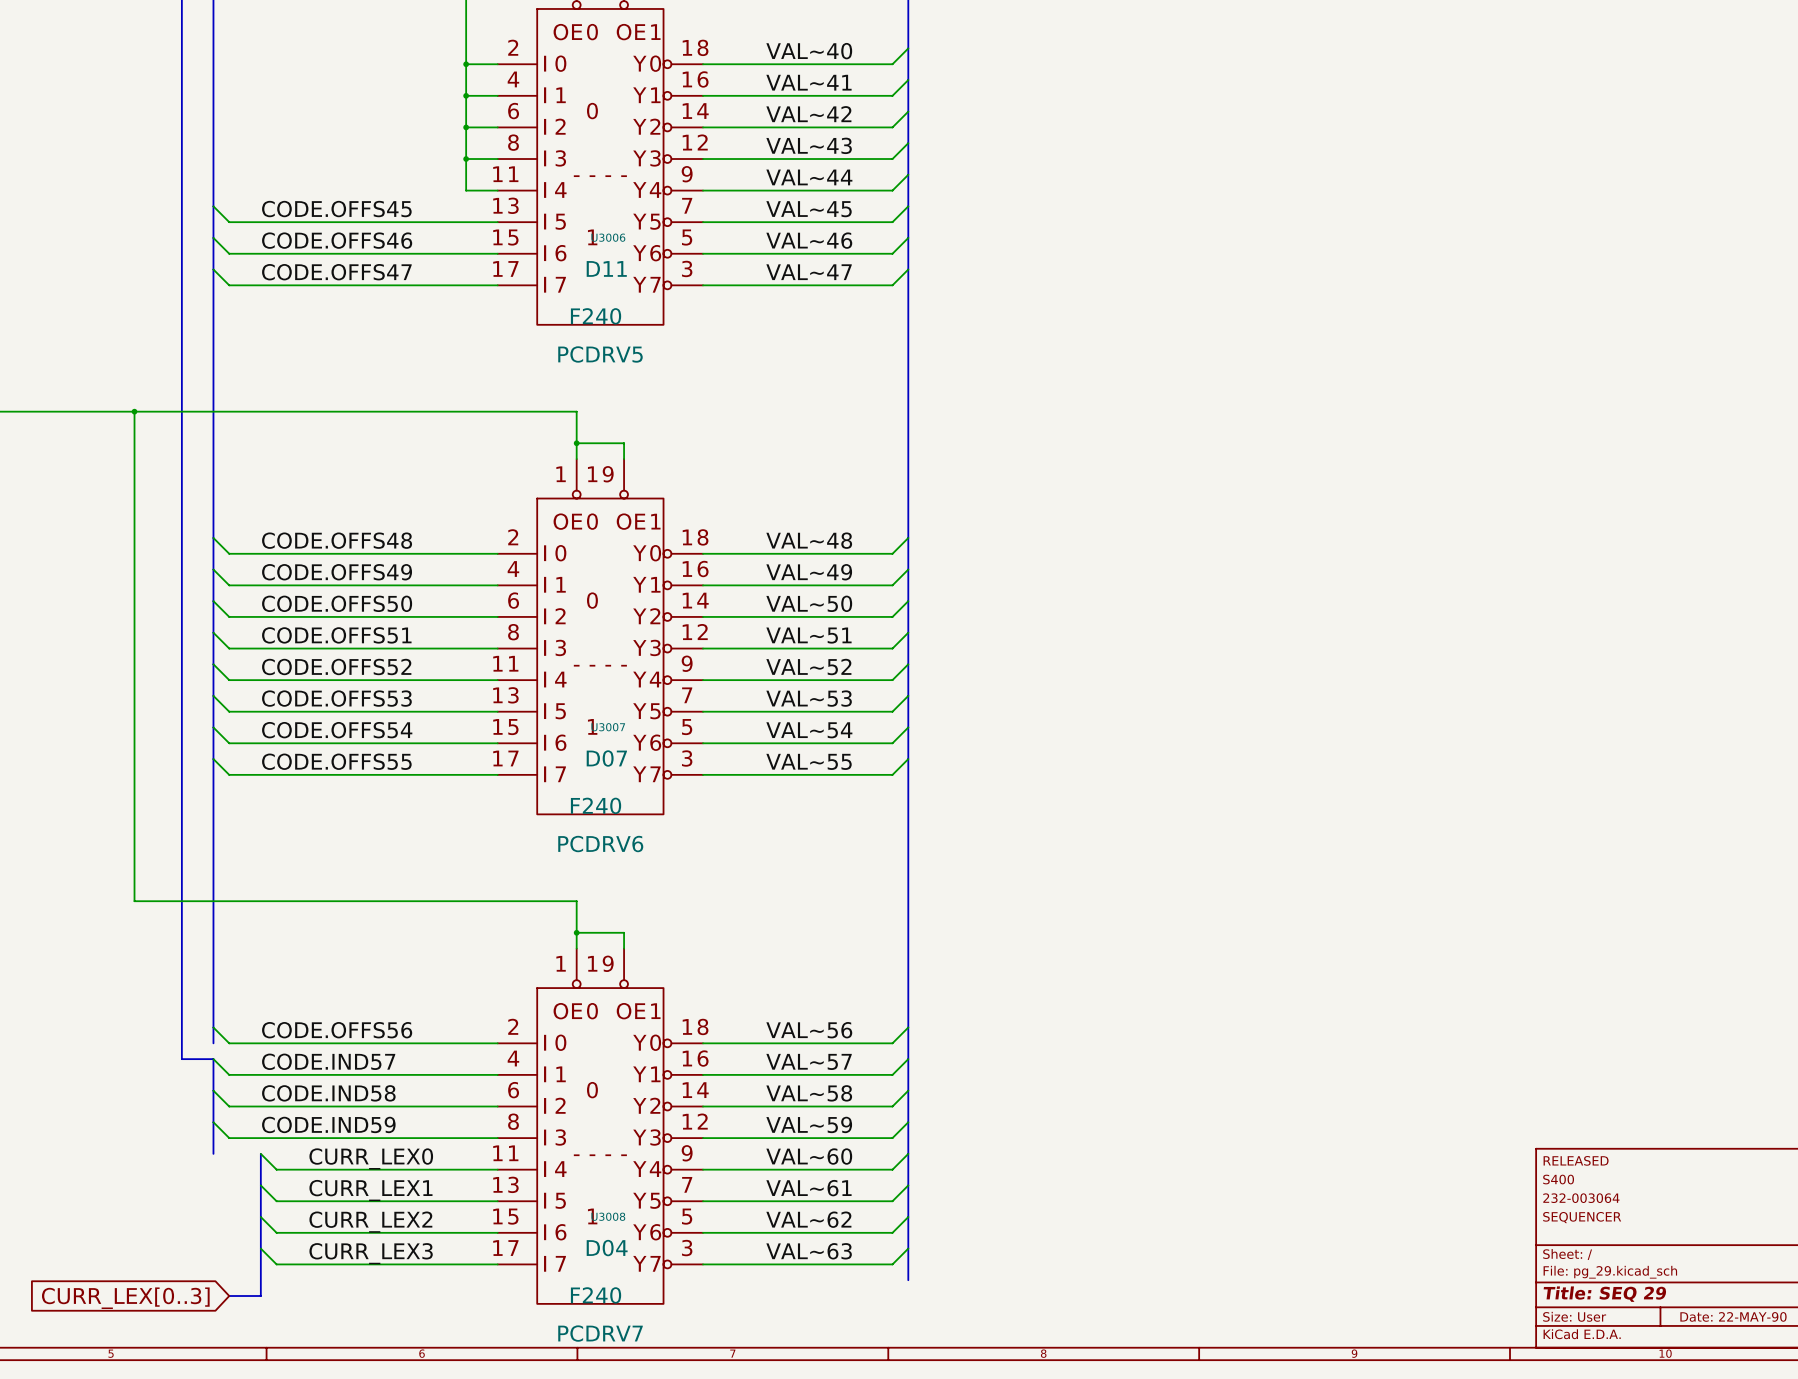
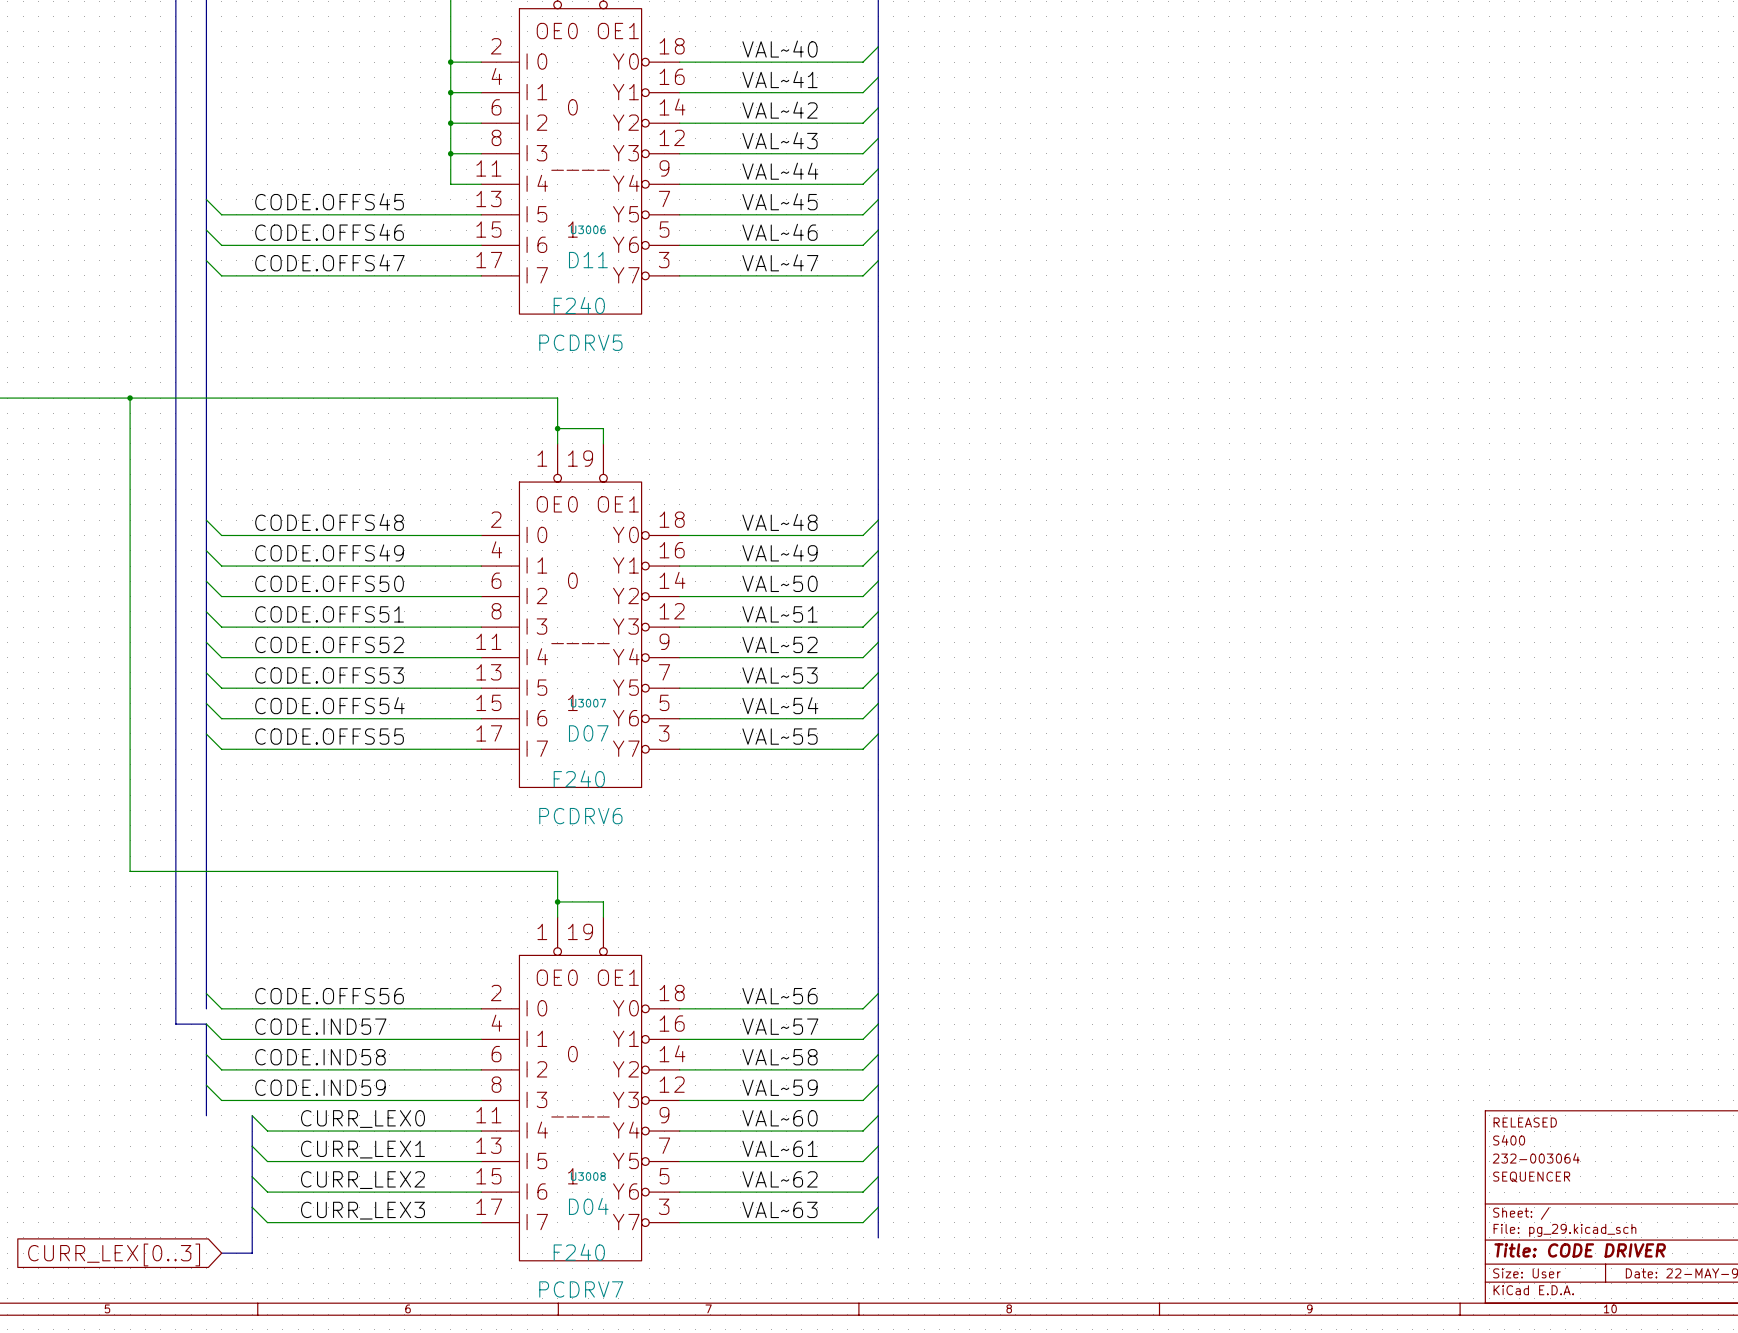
title block: Title: SEQ 29 (1604, 1294) -> Title: CODE DRIVER (1580, 1250)

